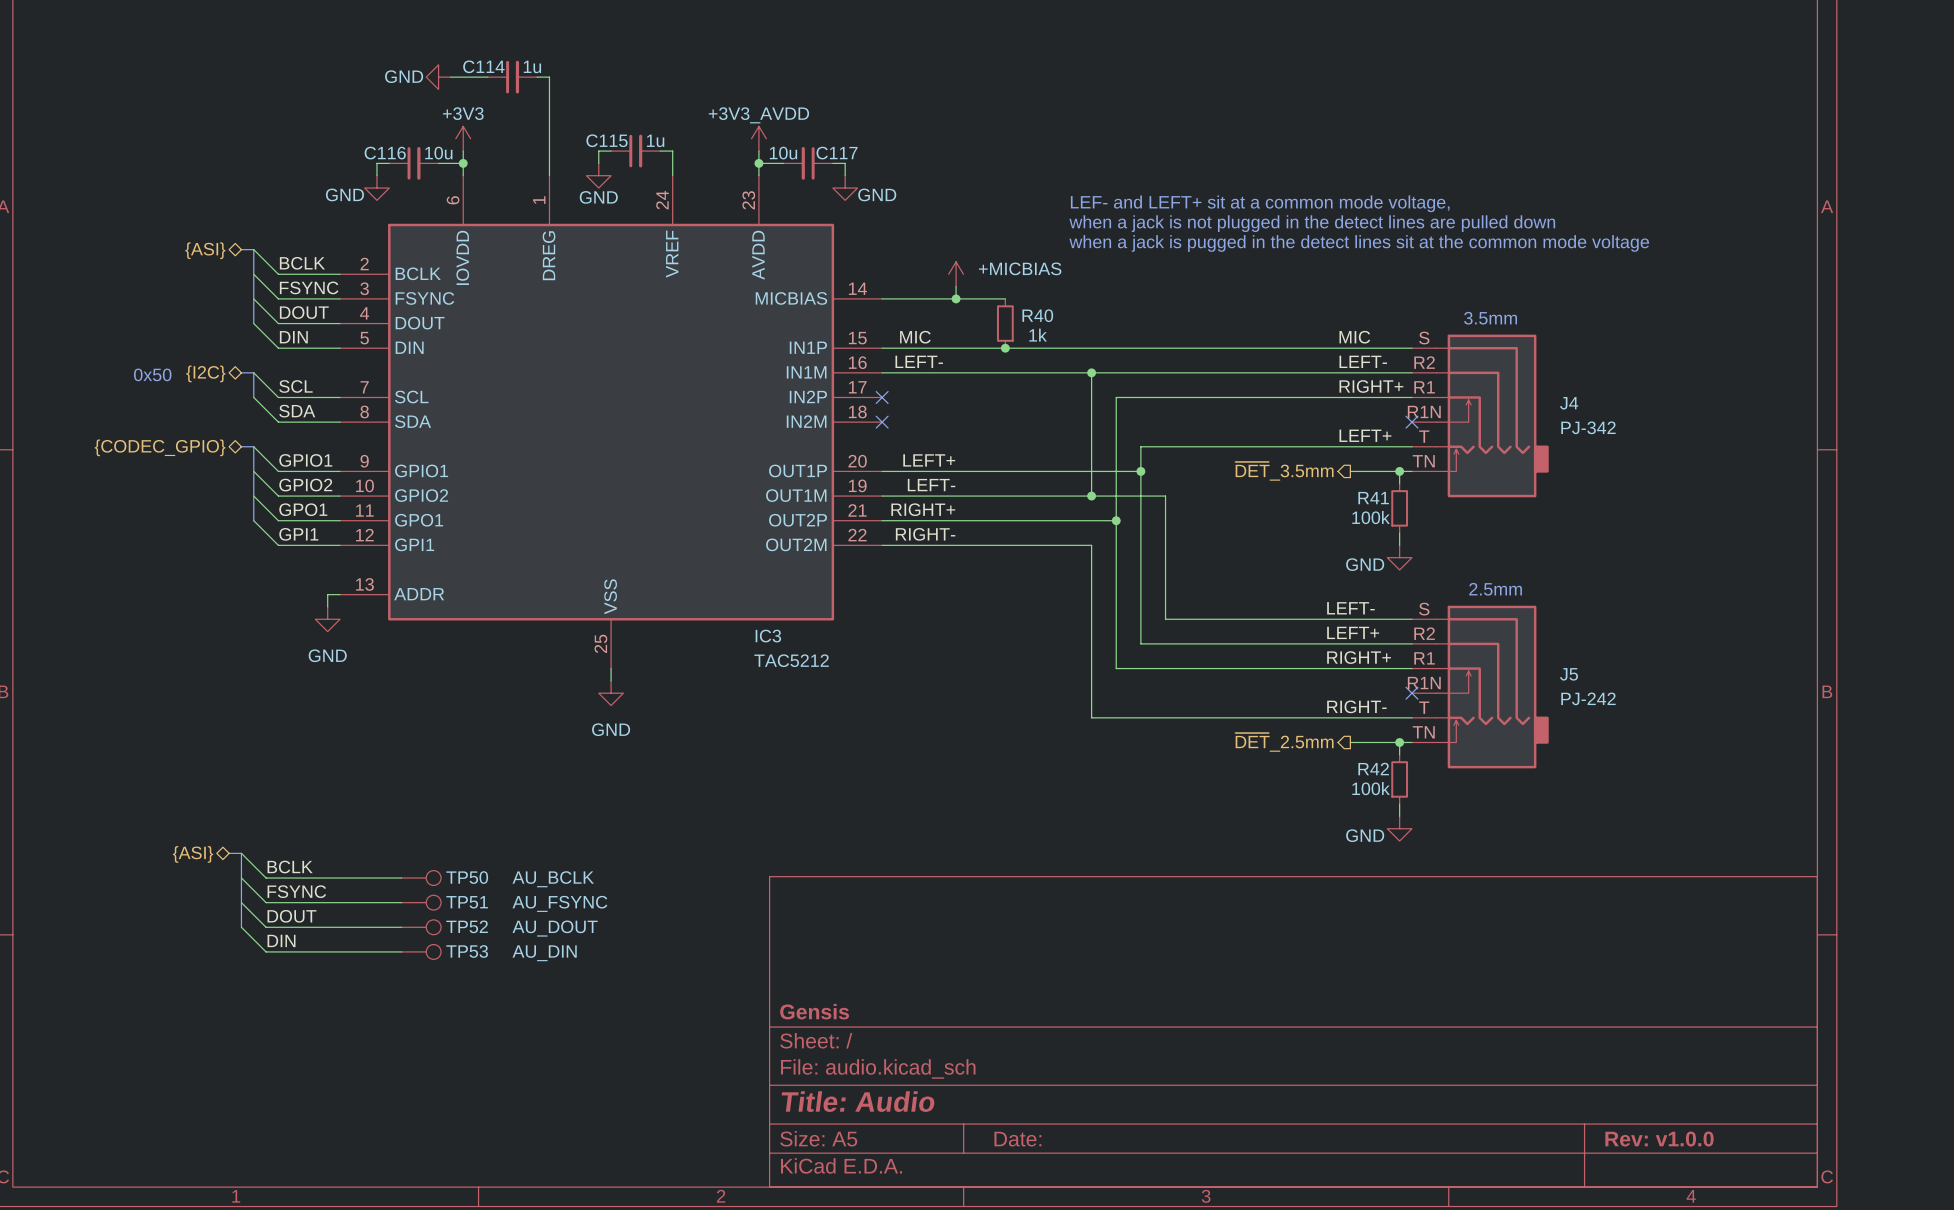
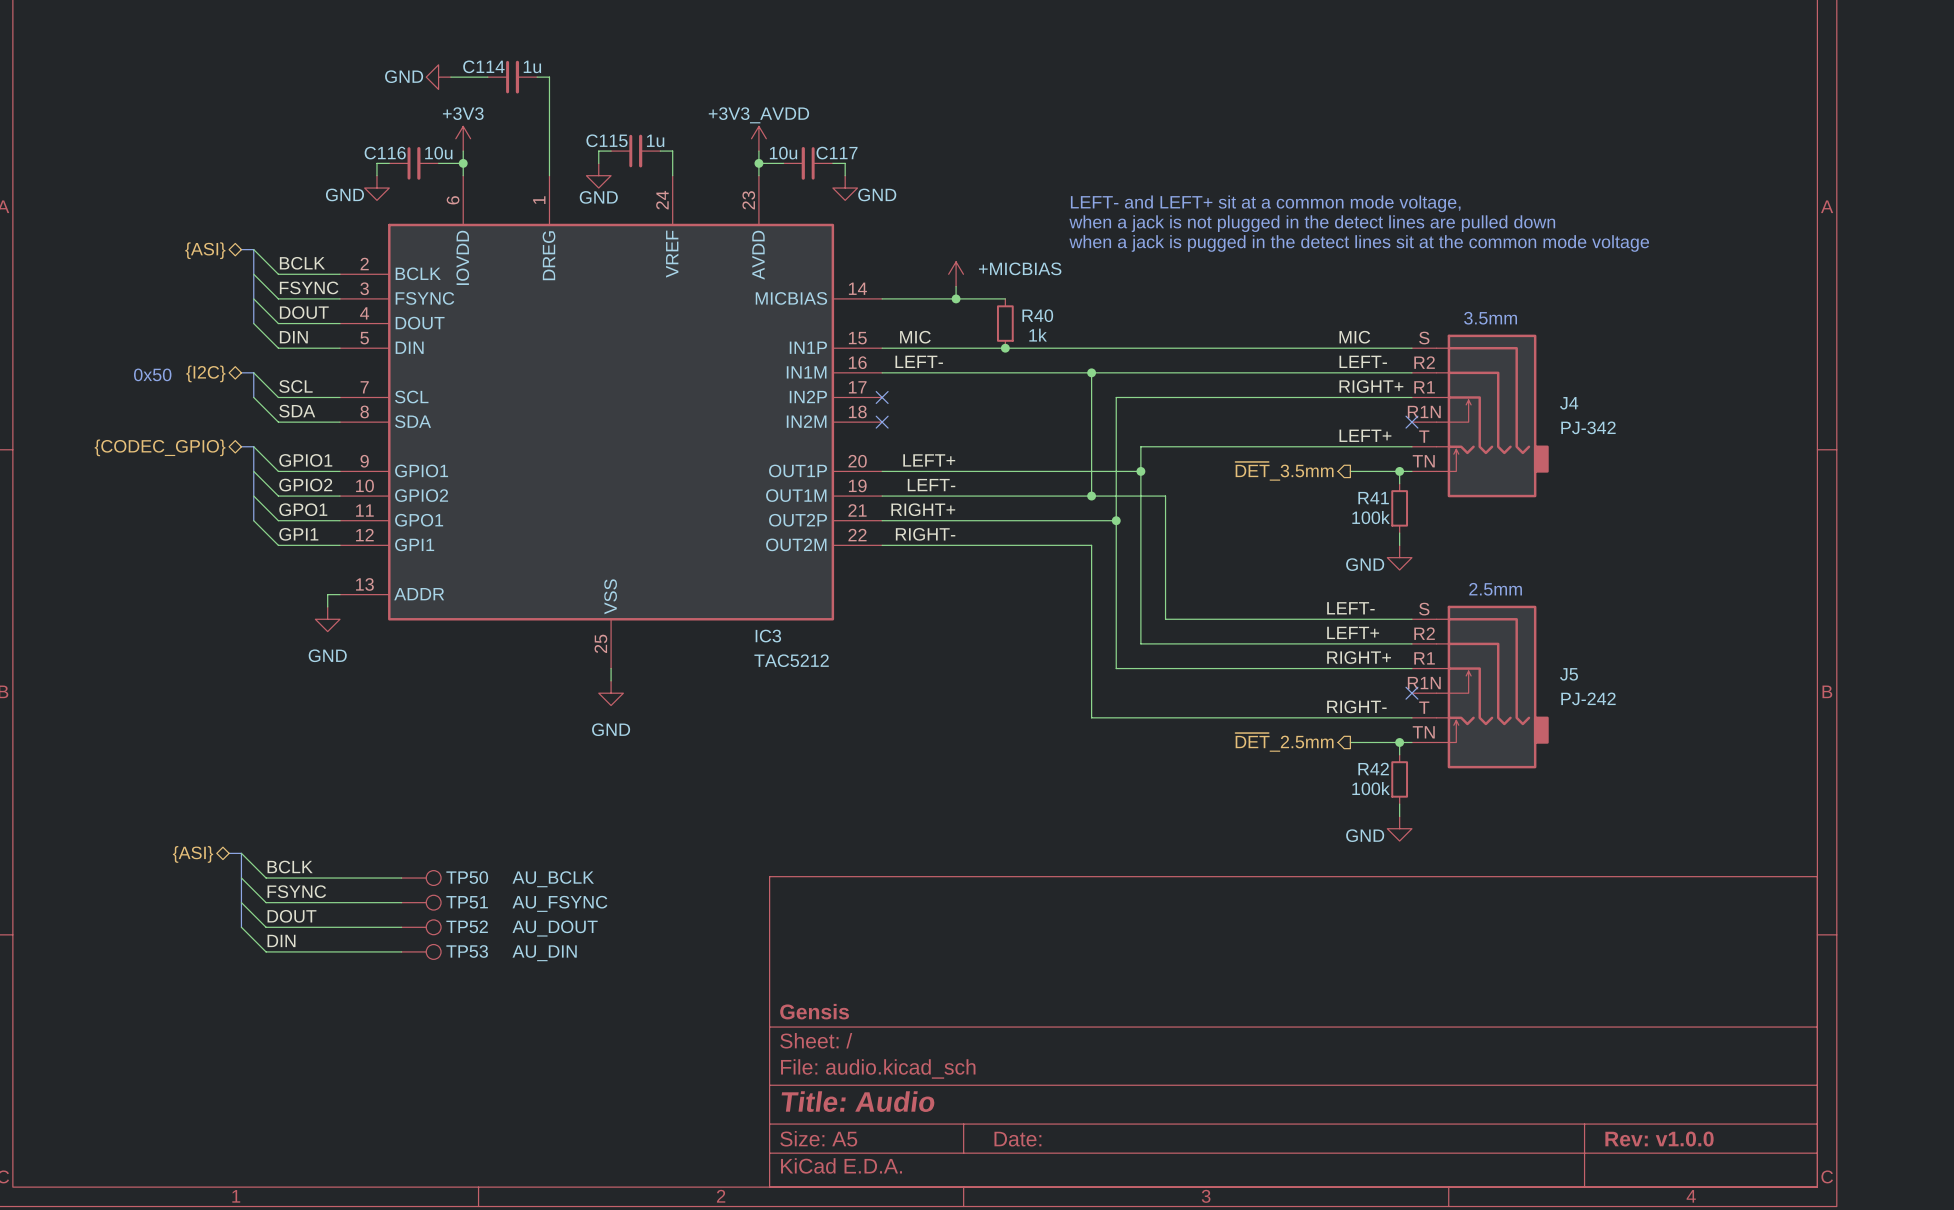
text: LEF- and LEFT+ sit at a common mode voltage, (1260, 203) -> LEFT- and LEFT+ sit at a common mode voltage, (1265, 203)

